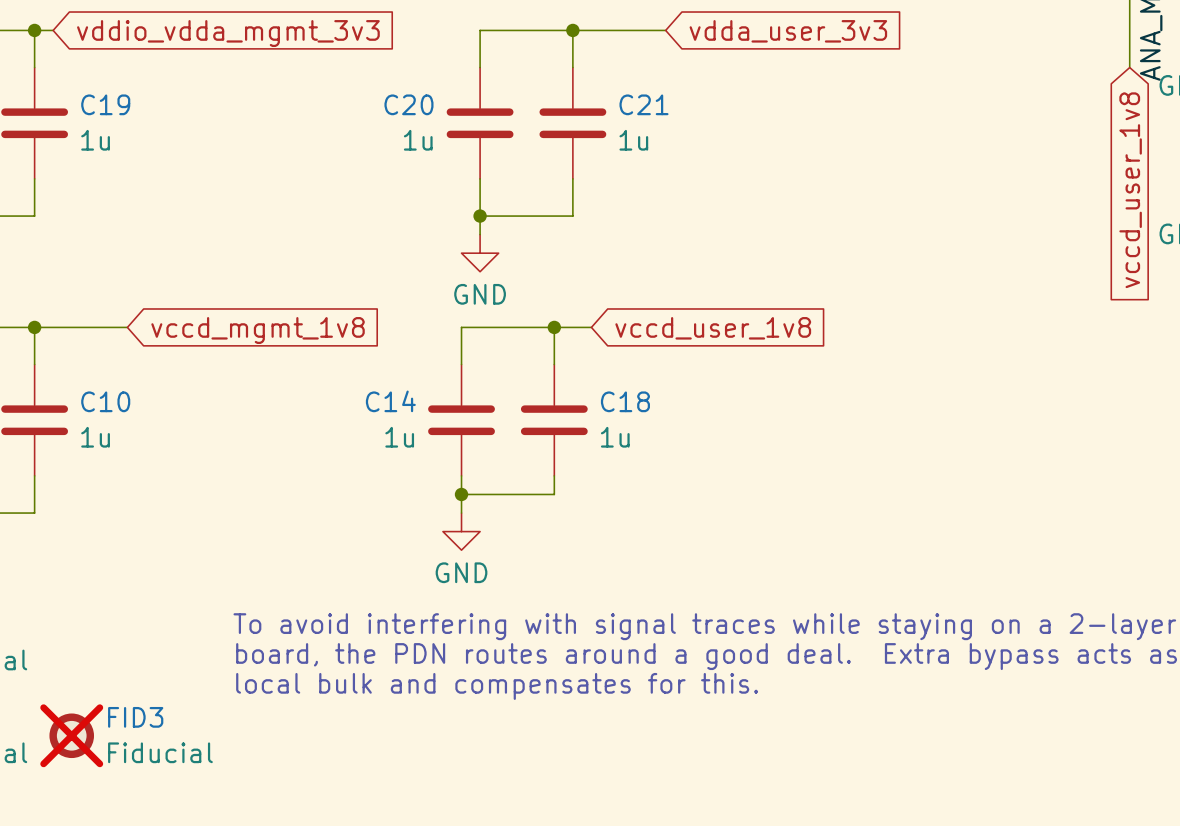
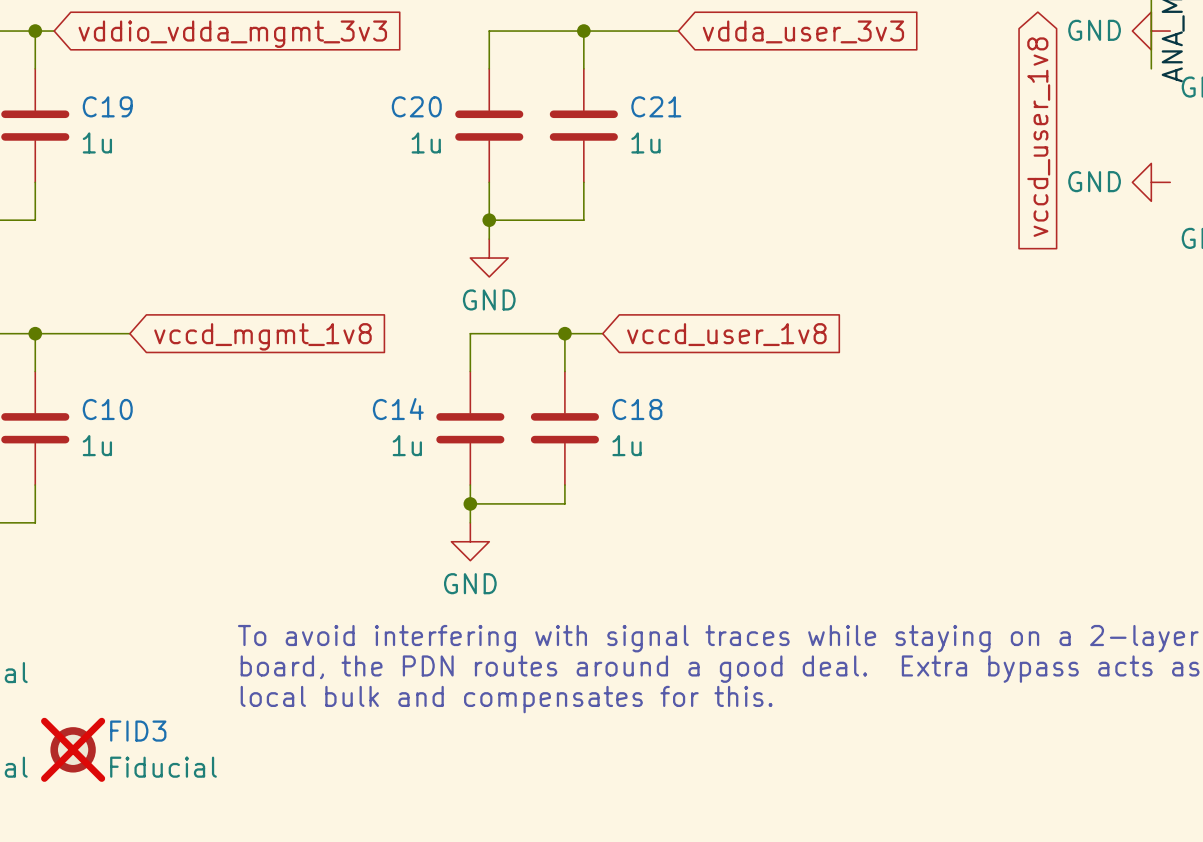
power symbol: none -> GND (1151, 31)
power symbol: none -> GND (1151, 182)
global label position: vccd_user_1v8 (1130, 190) -> vccd_user_1v8 (1038, 137)

